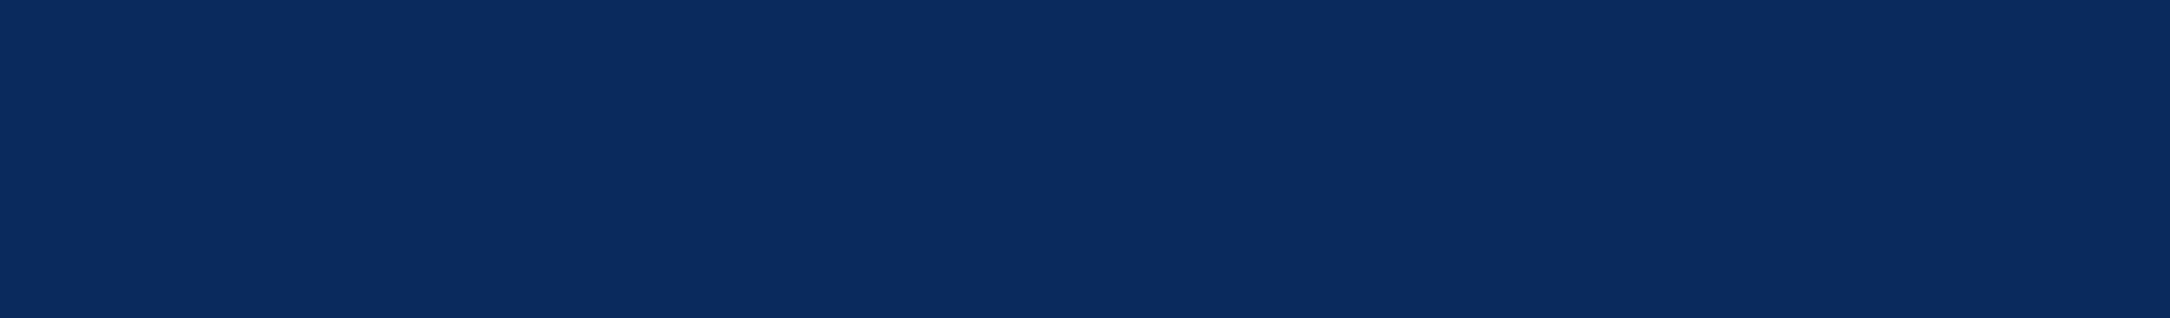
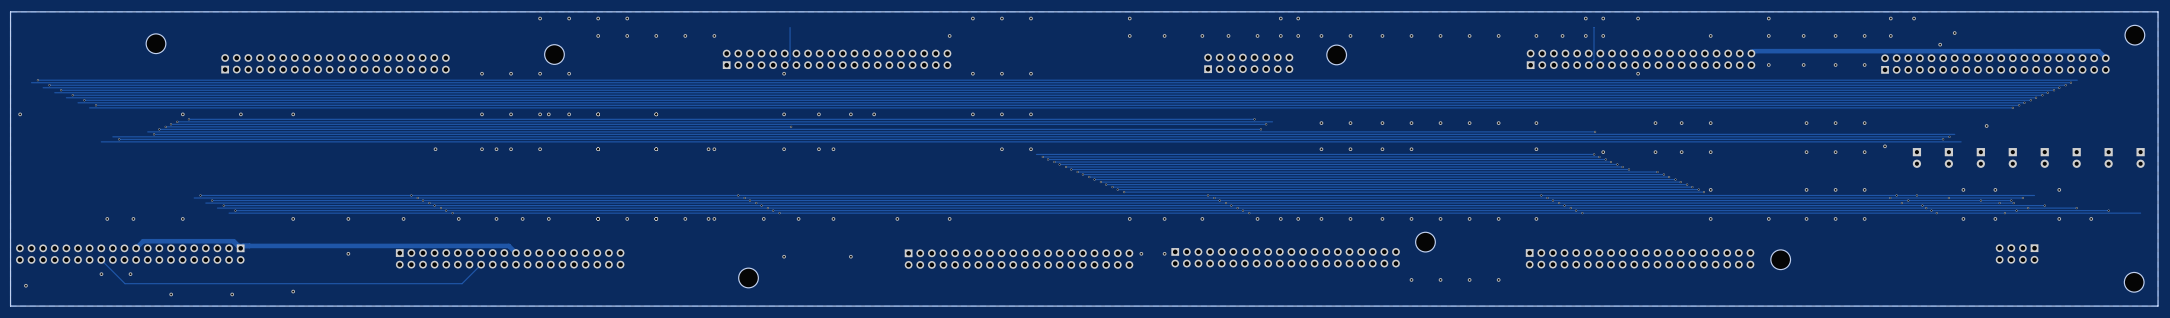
board edge: none -> (2158, 11) (2158, 306) (10, 306) (10, 11) (2158, 11)
via: none -> (540, 18)
via: none -> (569, 18)
via: none -> (598, 18)
via: none -> (627, 18)
via: none -> (972, 18)
via: none -> (1001, 18)
via: none -> (1030, 18)
via: none -> (1129, 18)
via: none -> (1280, 18)
via: none -> (1298, 18)
via: none -> (1585, 18)
via: none -> (1603, 18)
via: none -> (1638, 18)
via: none -> (1768, 18)
via: none -> (1890, 18)
via: none -> (1914, 18)
track: none -> (790, 27) (790, 59) (784, 65)
track: none -> (1594, 27) (1594, 59) (1588, 65)
via: none -> (1954, 33)
via: none -> (598, 35)
via: none -> (627, 35)
via: none -> (656, 35)
via: none -> (685, 35)
via: none -> (714, 35)
via: none -> (949, 35)
via: none -> (1129, 35)
via: none -> (1164, 35)
via: none -> (1202, 35)
via: none -> (1228, 35)
via: none -> (1257, 35)
via: none -> (1280, 35)
via: none -> (1298, 35)
via: none -> (1321, 35)
via: none -> (1350, 35)
via: none -> (1382, 35)
via: none -> (1411, 35)
via: none -> (1440, 35)
via: none -> (1469, 35)
via: none -> (1498, 35)
via: none -> (1536, 35)
via: none -> (1562, 35)
via: none -> (1585, 35)
via: none -> (1603, 35)
via: none -> (1710, 35)
via: none -> (1768, 35)
via: none -> (1803, 35)
via: none -> (1835, 35)
via: none -> (1864, 35)
via: none -> (1890, 35)
part: none -> (2134, 35)
part: none -> (156, 43)
via: none -> (1940, 44)
track: none -> (1751, 53) (1753, 51) (2098, 51) (2105, 58)
part: none -> (554, 54)
part: none -> (1336, 54)
part: none -> (837, 59)
part: none -> (1641, 59)
part: none -> (335, 63)
part: none -> (1248, 63)
via: none -> (1768, 64)
via: none -> (1803, 64)
via: none -> (1835, 64)
via: none -> (1864, 64)
part: none -> (1995, 64)
via: none -> (481, 73)
via: none -> (511, 73)
via: none -> (540, 73)
via: none -> (569, 73)
via: none -> (784, 73)
via: none -> (972, 73)
via: none -> (1001, 73)
via: none -> (1030, 73)
via: none -> (1638, 73)
via: none -> (37, 80)
track: none -> (2077, 80) (37, 80)
track: none -> (2070, 82) (31, 82)
via: none -> (2070, 82)
via: none -> (49, 85)
track: none -> (2065, 85) (49, 85)
via: none -> (2065, 85)
track: none -> (2059, 87) (43, 87)
via: none -> (2059, 87)
via: none -> (61, 90)
track: none -> (2054, 90) (61, 90)
via: none -> (2054, 90)
track: none -> (2047, 92) (54, 92)
via: none -> (2047, 92)
via: none -> (72, 95)
track: none -> (2042, 95) (72, 95)
via: none -> (2042, 95)
track: none -> (2036, 97) (66, 97)
via: none -> (2036, 97)
via: none -> (84, 100)
track: none -> (2030, 100) (84, 100)
via: none -> (2030, 100)
track: none -> (2024, 102) (78, 102)
via: none -> (2024, 102)
via: none -> (95, 105)
track: none -> (2019, 105) (95, 105)
via: none -> (2019, 105)
track: none -> (2012, 107) (89, 107)
via: none -> (2012, 107)
via: none -> (20, 114)
via: none -> (182, 114)
via: none -> (240, 114)
via: none -> (293, 114)
via: none -> (481, 114)
via: none -> (511, 114)
via: none -> (540, 114)
via: none -> (548, 114)
via: none -> (569, 114)
via: none -> (598, 114)
via: none -> (656, 114)
via: none -> (784, 114)
via: none -> (818, 114)
via: none -> (850, 114)
via: none -> (874, 114)
via: none -> (972, 114)
via: none -> (1001, 114)
via: none -> (1030, 114)
via: none -> (188, 119)
track: none -> (1254, 119) (188, 119)
via: none -> (1254, 119)
via: none -> (177, 121)
track: none -> (1272, 121) (177, 121)
via: none -> (1321, 123)
via: none -> (1350, 123)
via: none -> (1382, 123)
via: none -> (1411, 123)
via: none -> (1440, 123)
via: none -> (1469, 123)
via: none -> (1498, 123)
via: none -> (1536, 123)
via: none -> (1655, 123)
via: none -> (1681, 123)
via: none -> (1710, 123)
via: none -> (1806, 123)
via: none -> (1835, 123)
via: none -> (1864, 123)
via: none -> (170, 124)
track: none -> (1266, 124) (170, 124)
via: none -> (1266, 124)
via: none -> (1986, 125)
via: none -> (165, 126)
track: none -> (791, 126) (165, 126)
via: none -> (791, 126)
via: none -> (159, 129)
track: none -> (1260, 129) (159, 129)
via: none -> (1260, 129)
track: none -> (1595, 131) (147, 131)
via: none -> (1595, 131)
via: none -> (154, 134)
track: none -> (1954, 134) (154, 134)
track: none -> (1949, 136) (112, 136)
via: none -> (1949, 136)
via: none -> (119, 139)
track: none -> (1943, 139) (119, 139)
via: none -> (1943, 139)
track: none -> (1961, 141) (101, 141)
via: none -> (1884, 146)
via: none -> (435, 149)
via: none -> (481, 149)
via: none -> (496, 149)
via: none -> (511, 149)
via: none -> (540, 149)
via: none -> (598, 149)
via: none -> (656, 149)
via: none -> (708, 149)
via: none -> (714, 149)
via: none -> (784, 149)
via: none -> (818, 149)
via: none -> (833, 149)
via: none -> (1001, 149)
via: none -> (1030, 149)
via: none -> (1321, 149)
via: none -> (1350, 149)
via: none -> (1382, 149)
via: none -> (1411, 149)
via: none -> (1536, 149)
via: none -> (1603, 152)
via: none -> (1655, 152)
via: none -> (1681, 152)
via: none -> (1710, 152)
via: none -> (1806, 152)
via: none -> (1835, 152)
via: none -> (1864, 152)
track: none -> (1594, 154) (1036, 154)
via: none -> (1594, 154)
via: none -> (1042, 156)
track: none -> (1599, 156) (1042, 156)
via: none -> (1599, 156)
part: none -> (1916, 157)
part: none -> (1948, 157)
part: none -> (1980, 157)
part: none -> (2012, 157)
part: none -> (2044, 157)
part: none -> (2076, 157)
part: none -> (2108, 157)
part: none -> (2140, 157)
via: none -> (1048, 159)
track: none -> (1605, 159) (1048, 159)
via: none -> (1605, 159)
via: none -> (1054, 161)
track: none -> (1611, 161) (1054, 161)
via: none -> (1611, 161)
via: none -> (1059, 164)
track: none -> (1617, 164) (1059, 164)
via: none -> (1617, 164)
via: none -> (1066, 166)
track: none -> (1622, 166) (1066, 166)
via: none -> (1622, 166)
via: none -> (1071, 169)
track: none -> (1629, 169) (1071, 169)
via: none -> (1629, 169)
via: none -> (1077, 172)
track: none -> (1657, 172) (1077, 172)
via: none -> (1657, 172)
via: none -> (1082, 174)
track: none -> (1663, 174) (1082, 174)
via: none -> (1663, 174)
via: none -> (1089, 177)
track: none -> (1669, 177) (1089, 177)
via: none -> (1669, 177)
via: none -> (1094, 179)
track: none -> (1675, 179) (1094, 179)
via: none -> (1675, 179)
via: none -> (1100, 182)
track: none -> (1680, 182) (1100, 182)
via: none -> (1680, 182)
via: none -> (1106, 184)
track: none -> (1687, 184) (1106, 184)
via: none -> (1687, 184)
via: none -> (1112, 187)
track: none -> (1692, 187) (1112, 187)
via: none -> (1692, 187)
via: none -> (1117, 189)
track: none -> (1698, 189) (1117, 189)
via: none -> (1698, 189)
via: none -> (1710, 189)
via: none -> (1806, 189)
via: none -> (1835, 189)
via: none -> (1864, 189)
via: none -> (1963, 189)
via: none -> (1995, 189)
via: none -> (2059, 189)
via: none -> (1124, 192)
track: none -> (1703, 192) (1124, 192)
via: none -> (1703, 192)
via: none -> (200, 195)
via: none -> (411, 195)
via: none -> (738, 195)
via: none -> (1208, 195)
via: none -> (1541, 195)
via: none -> (1896, 195)
via: none -> (1916, 195)
track: none -> (2034, 195) (200, 195)
via: none -> (417, 197)
via: none -> (744, 197)
via: none -> (1214, 197)
via: none -> (1547, 197)
via: none -> (1890, 197)
via: none -> (1948, 197)
track: none -> (2022, 197) (194, 197)
via: none -> (2022, 197)
via: none -> (212, 200)
via: none -> (423, 200)
via: none -> (749, 200)
via: none -> (1219, 200)
via: none -> (1552, 200)
via: none -> (1908, 200)
via: none -> (1980, 200)
track: none -> (2011, 200) (212, 200)
via: none -> (2011, 200)
via: none -> (429, 203)
via: none -> (756, 203)
via: none -> (1226, 203)
via: none -> (1559, 203)
via: none -> (1901, 203)
via: none -> (1999, 203)
track: none -> (2013, 203) (205, 203)
via: none -> (2013, 203)
via: none -> (223, 205)
via: none -> (434, 205)
via: none -> (761, 205)
via: none -> (1231, 205)
via: none -> (1564, 205)
via: none -> (1922, 205)
track: none -> (2044, 205) (223, 205)
via: none -> (2044, 205)
via: none -> (440, 208)
via: none -> (767, 208)
via: none -> (1237, 208)
via: none -> (1570, 208)
via: none -> (1926, 208)
via: none -> (2028, 208)
track: none -> (2076, 208) (217, 208)
via: none -> (2076, 208)
via: none -> (235, 210)
via: none -> (446, 210)
via: none -> (773, 210)
via: none -> (1242, 210)
via: none -> (1576, 210)
via: none -> (1931, 210)
via: none -> (2016, 210)
track: none -> (2108, 210) (235, 210)
via: none -> (2108, 210)
via: none -> (452, 213)
via: none -> (779, 213)
via: none -> (1249, 213)
via: none -> (1582, 213)
via: none -> (1936, 213)
via: none -> (2004, 213)
track: none -> (2140, 213) (229, 213)
via: none -> (107, 218)
via: none -> (133, 218)
via: none -> (182, 218)
via: none -> (293, 218)
via: none -> (348, 218)
via: none -> (403, 218)
via: none -> (458, 218)
via: none -> (496, 218)
via: none -> (522, 218)
via: none -> (548, 218)
via: none -> (598, 218)
via: none -> (627, 218)
via: none -> (656, 218)
via: none -> (685, 218)
via: none -> (708, 218)
via: none -> (714, 218)
via: none -> (763, 218)
via: none -> (798, 218)
via: none -> (833, 218)
via: none -> (897, 218)
via: none -> (949, 218)
via: none -> (1129, 218)
via: none -> (1164, 218)
via: none -> (1202, 218)
via: none -> (1257, 218)
via: none -> (1280, 218)
via: none -> (1298, 218)
via: none -> (1321, 218)
via: none -> (1350, 218)
via: none -> (1382, 218)
via: none -> (1411, 218)
via: none -> (1440, 218)
via: none -> (1469, 218)
via: none -> (1498, 218)
via: none -> (1536, 218)
via: none -> (1710, 218)
via: none -> (1768, 218)
via: none -> (1806, 218)
via: none -> (1835, 218)
via: none -> (1864, 218)
via: none -> (1963, 218)
via: none -> (1995, 218)
via: none -> (2059, 218)
via: none -> (2091, 218)
part: none -> (1425, 242)
track: none -> (238, 245) (508, 245) (515, 253)
track: none -> (243, 245) (240, 248) (233, 241) (143, 241) (136, 248)
via: none -> (348, 253)
via: none -> (1141, 253)
via: none -> (1164, 253)
part: none -> (2017, 253)
part: none -> (130, 254)
via: none -> (784, 256)
via: none -> (850, 256)
part: none -> (1285, 257)
part: none -> (510, 258)
part: none -> (1640, 258)
track: none -> (101, 259) (124, 283) (462, 283) (481, 264)
part: none -> (1019, 259)
part: none -> (1780, 259)
via: none -> (101, 274)
via: none -> (130, 274)
part: none -> (748, 277)
via: none -> (1411, 279)
via: none -> (1440, 279)
via: none -> (1469, 279)
via: none -> (1498, 279)
part: none -> (2134, 282)
via: none -> (25, 285)
via: none -> (293, 291)
via: none -> (171, 294)
via: none -> (232, 294)

